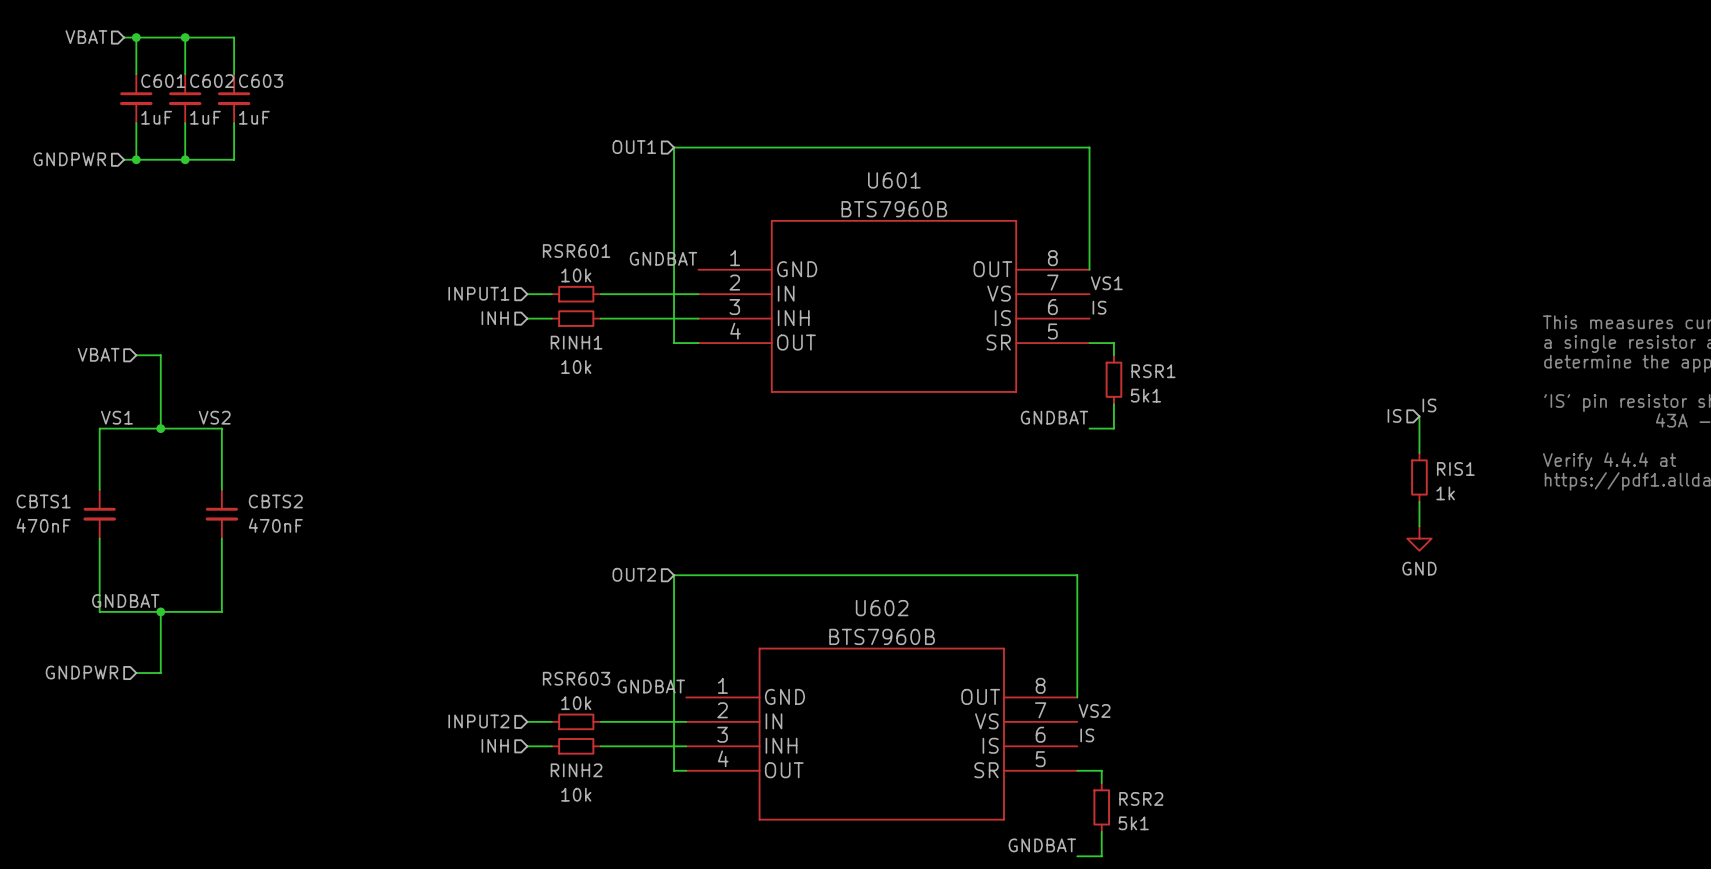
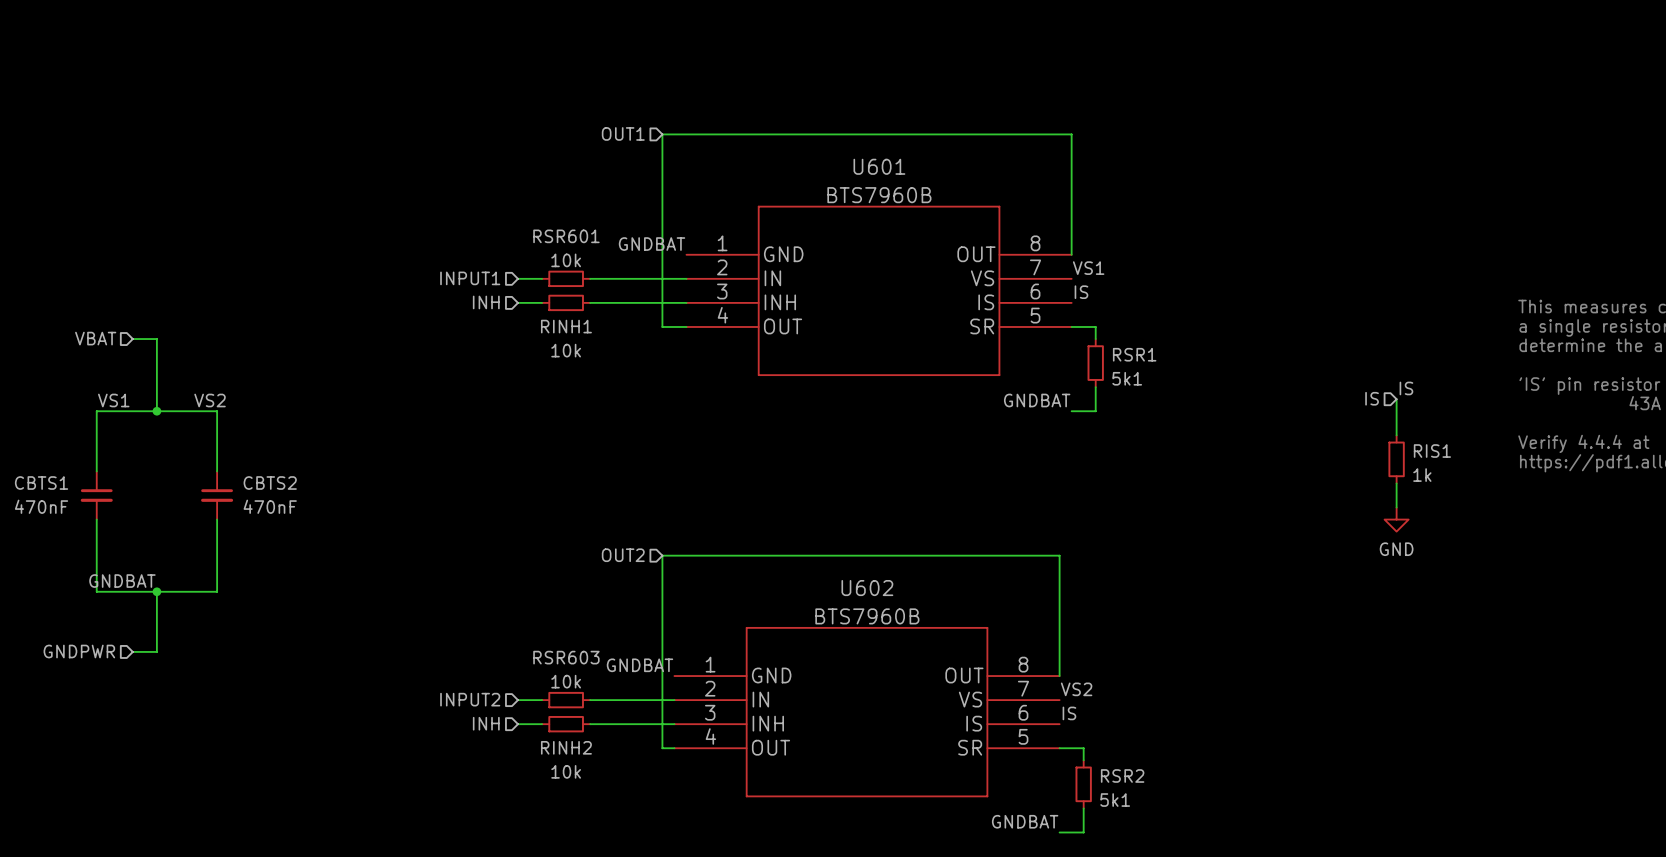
hierarchical label: VBAT (86, 37) -> none
wire: (124, 37) (234, 37) (234, 74) -> none
wire: (136, 37) (136, 74) -> none
junction: (136, 37) -> none
wire: (185, 37) (185, 74) -> none
junction: (185, 37) -> none
C601: 1uF (136, 98) -> none
C602: 1uF (185, 98) -> none
C603: 1uF (234, 98) -> none
wire: (136, 123) (136, 159) -> none
wire: (185, 123) (185, 159) -> none
wire: (234, 123) (234, 159) (124, 159) -> none
hierarchical label: GNDPWR (69, 159) -> none
junction: (136, 159) -> none
junction: (185, 159) -> none

